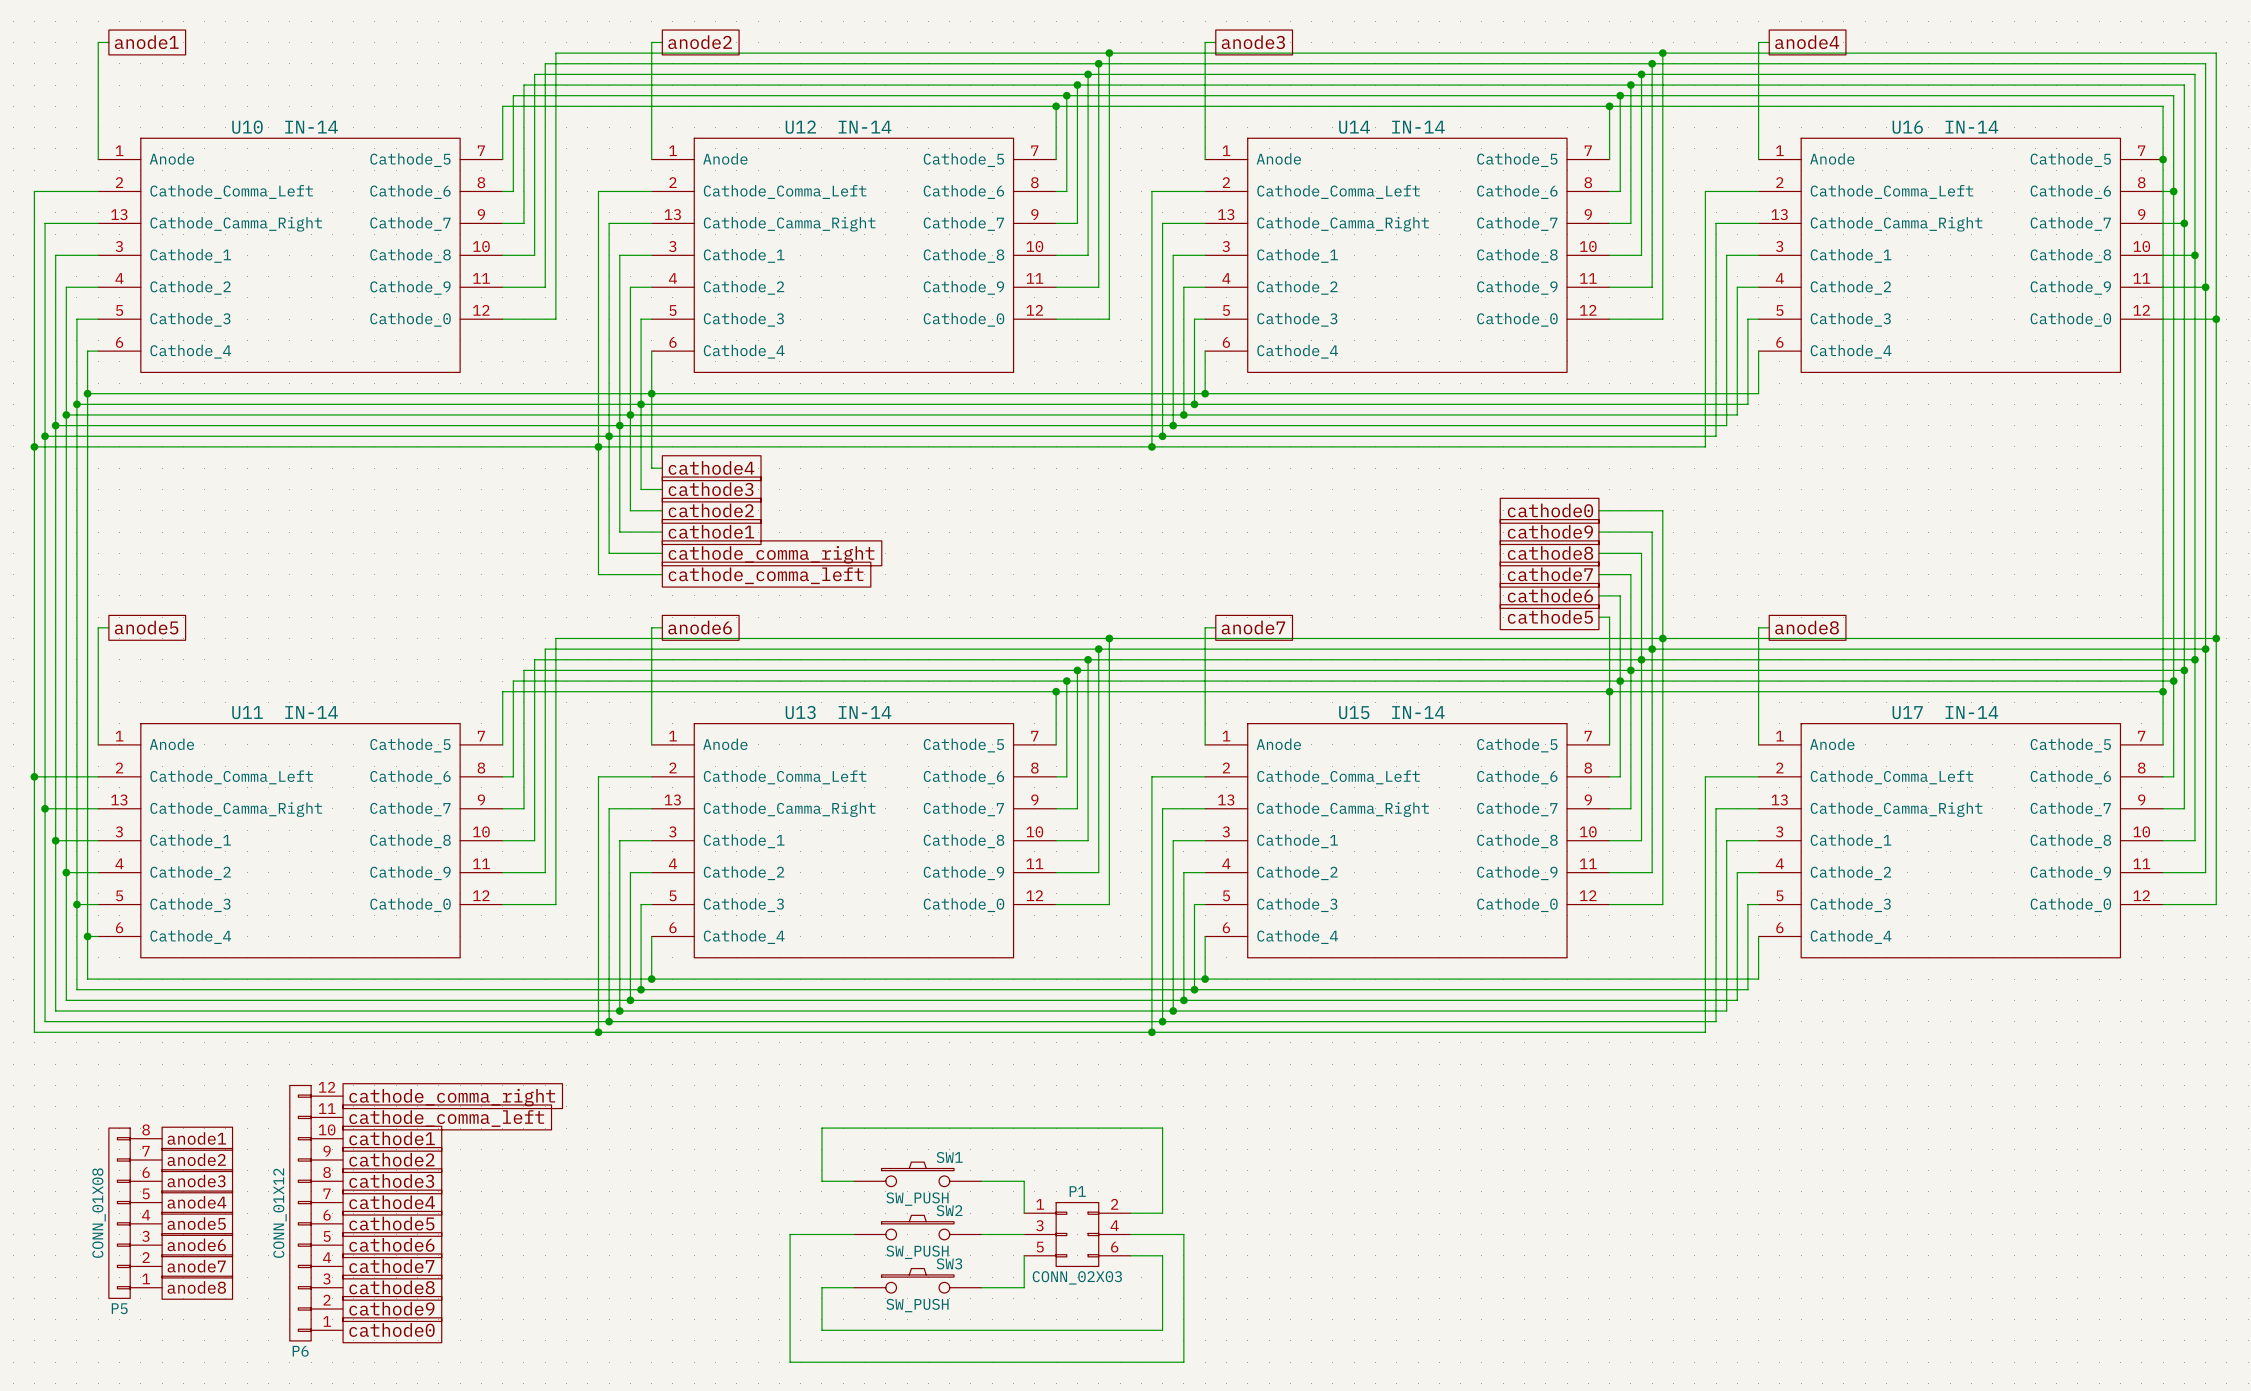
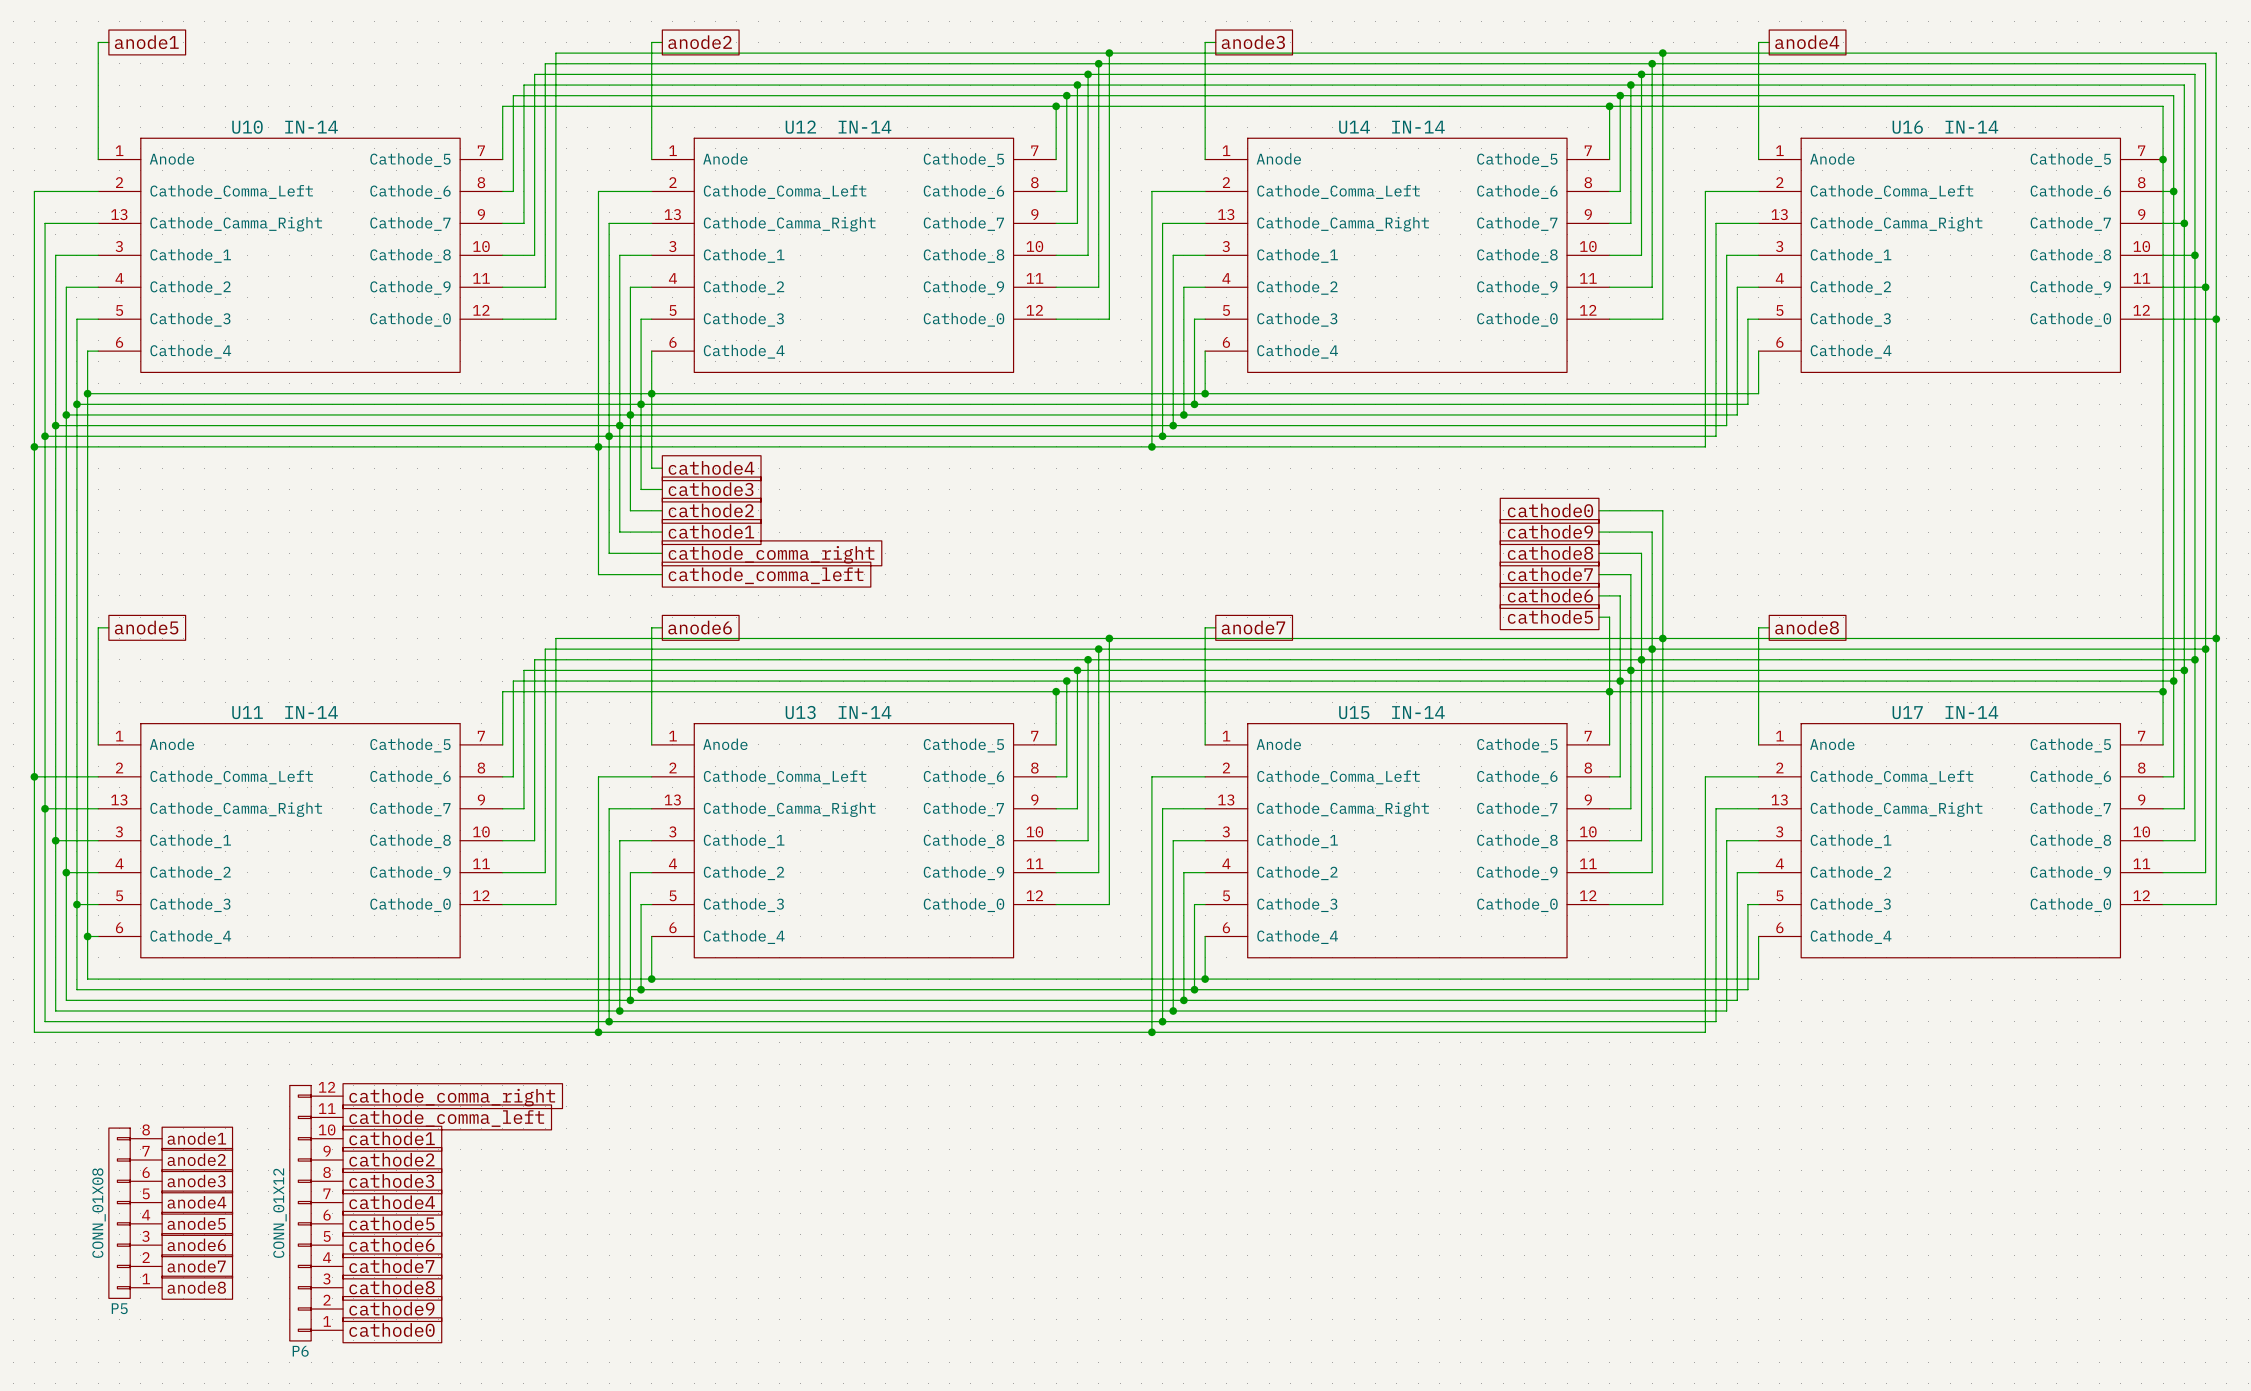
SW1: SW_PUSH (917, 1174) -> none
wire: (853, 1181) (821, 1181) (821, 1128) (1162, 1128) (1162, 1213) (1130, 1213) -> none
wire: (981, 1181) (1024, 1181) (1024, 1213) -> none
SW2: SW_PUSH (917, 1227) -> none
wire: (853, 1234) (790, 1234) (790, 1362) (1183, 1362) (1183, 1234) (1130, 1234) -> none
wire: (981, 1234) (1024, 1234) -> none
P1: CONN_02X03 (1077, 1234) -> none
wire: (1024, 1255) (1024, 1287) (981, 1287) -> none
wire: (1130, 1255) (1162, 1255) (1162, 1330) (821, 1330) (821, 1287) (853, 1287) -> none
SW3: SW_PUSH (917, 1280) -> none

